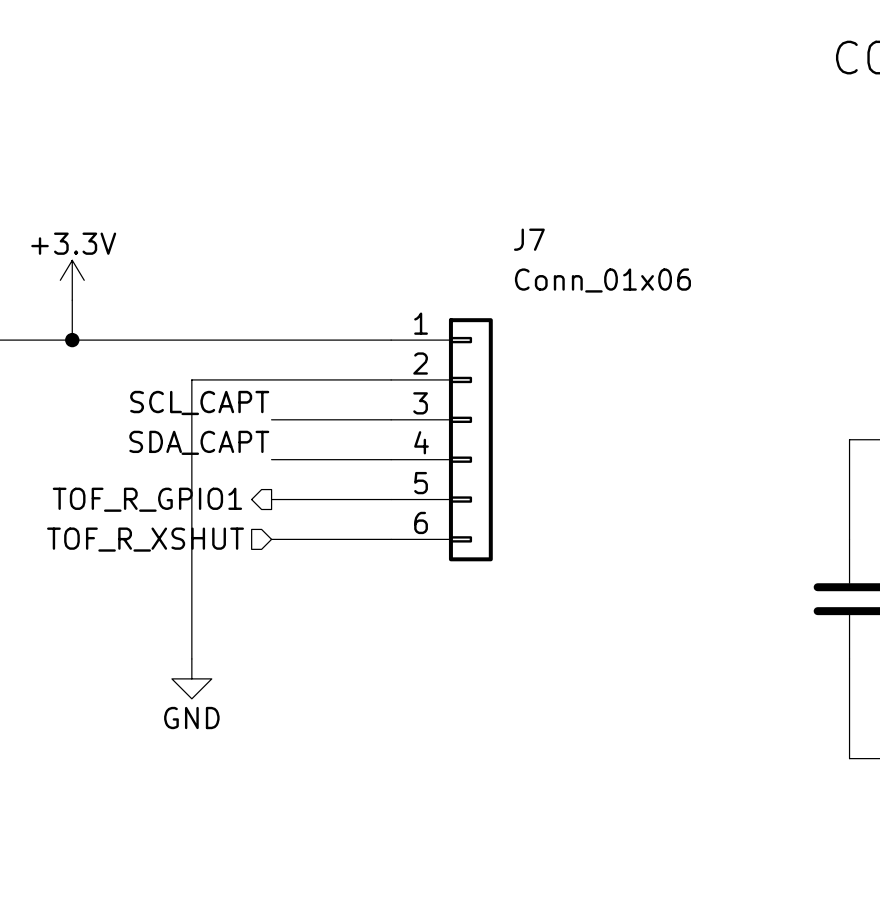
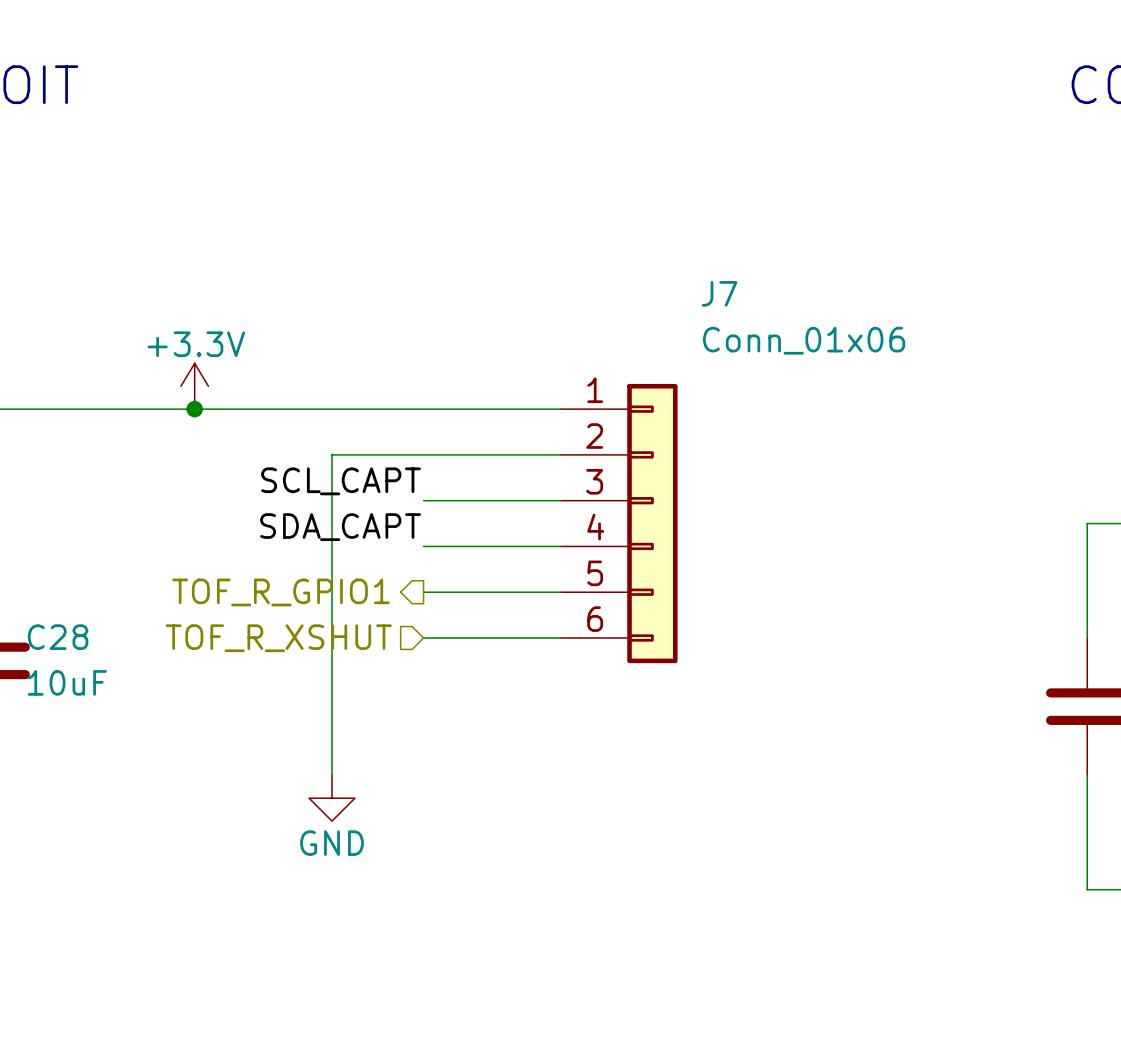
power symbol position: +3.3V (72, 280) -> +3.3V (194, 386)

